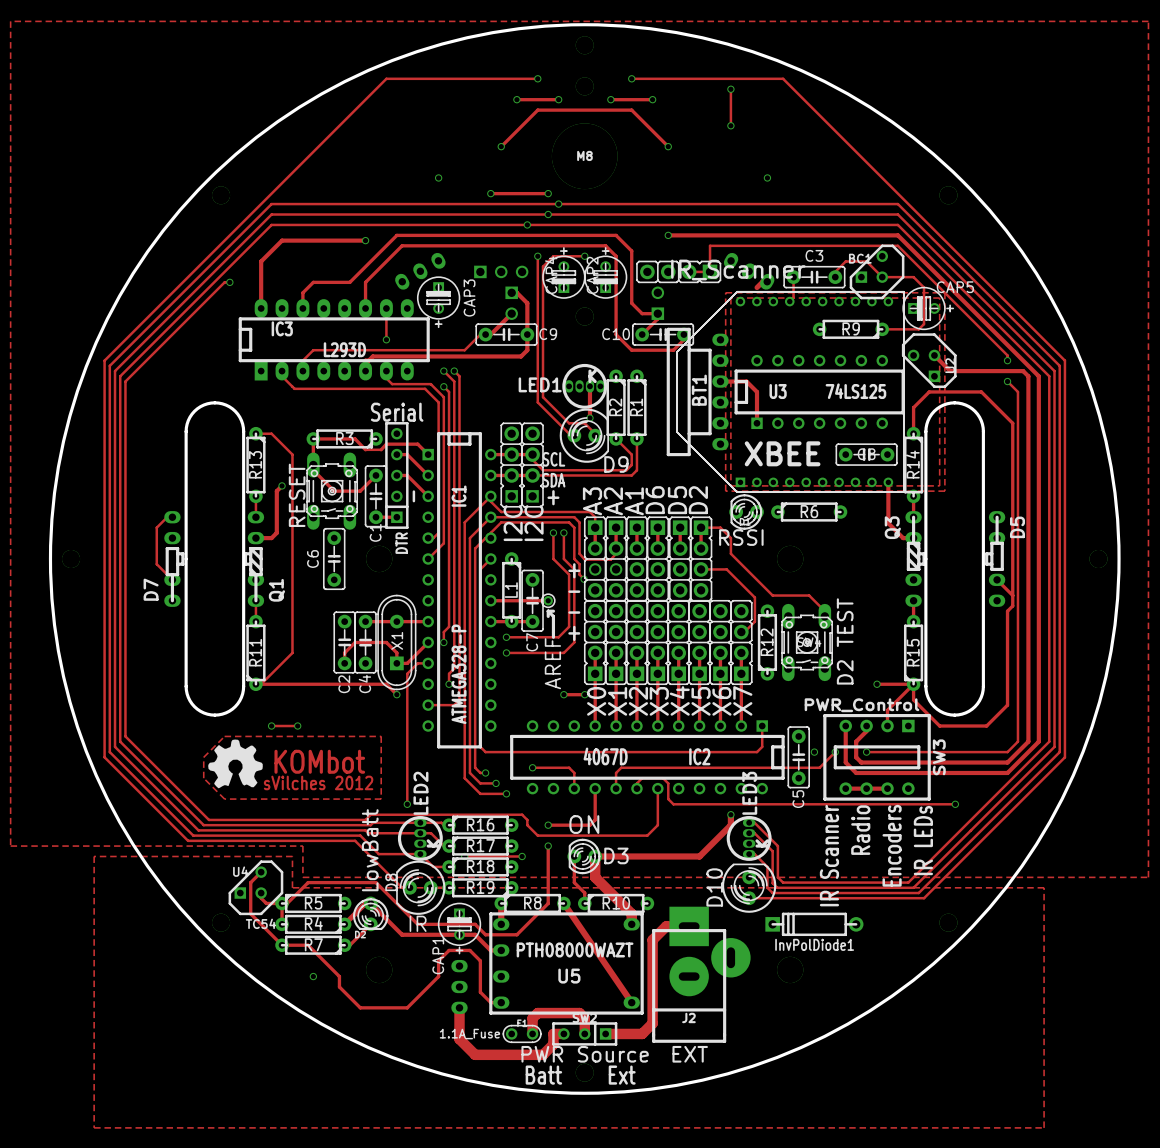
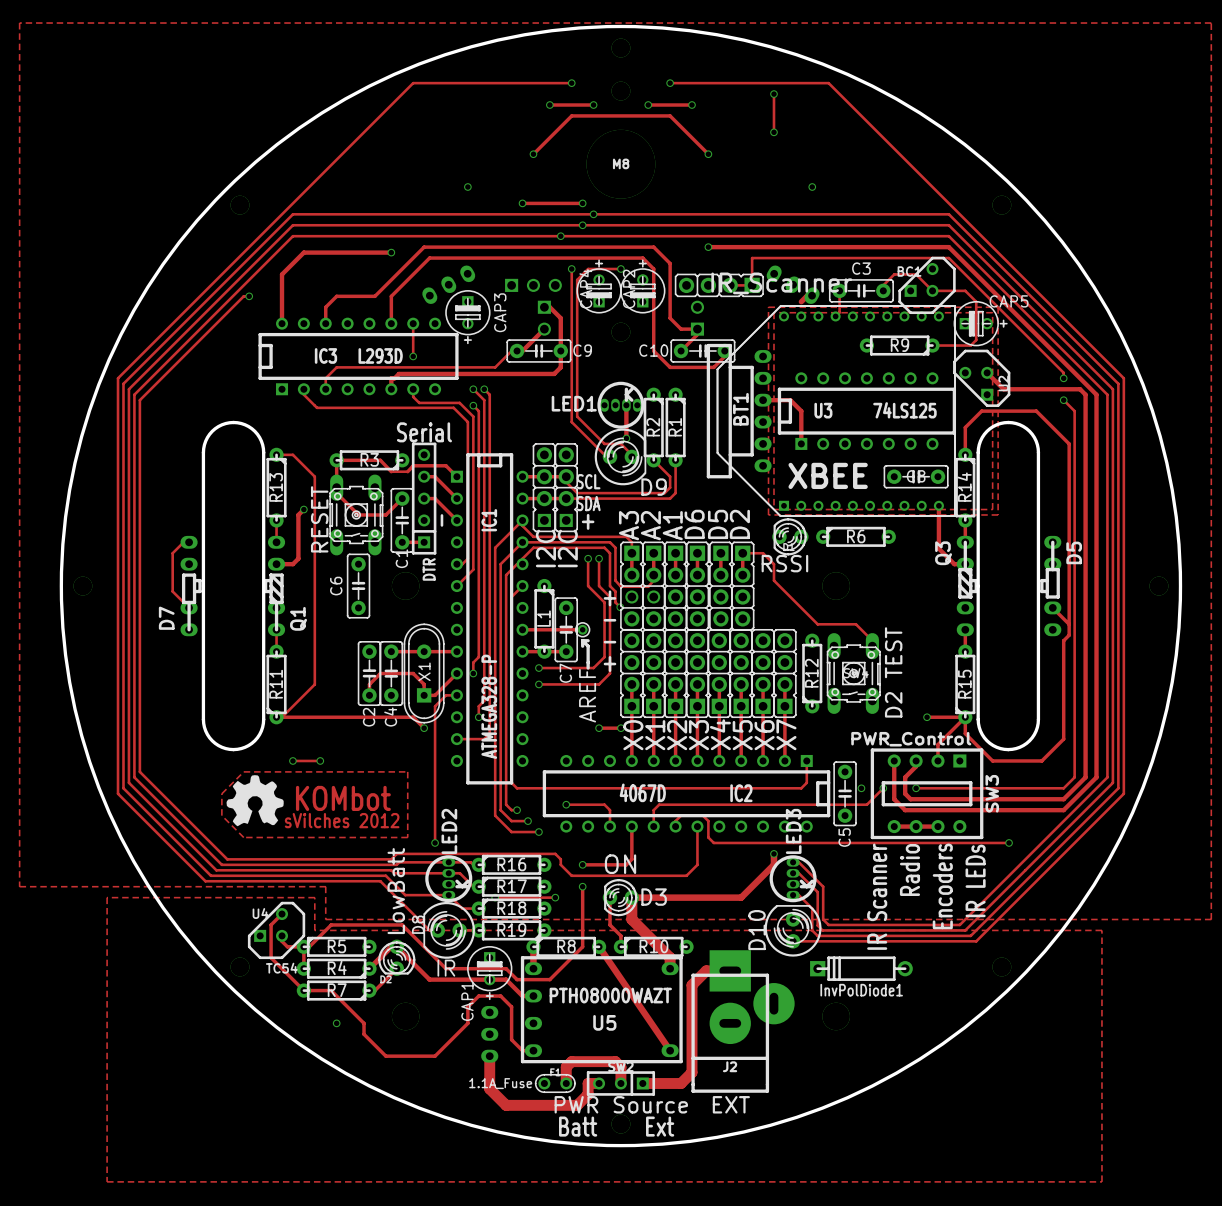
IC3 footprint: [238, 299, 430, 381] -> [258, 317, 459, 396]
IC3 name position: IC3 (282, 328) -> IC3 (325, 355)
track: (701, 569) (726, 569) (754, 597) (754, 621) (744, 632) (741, 632) -> none

